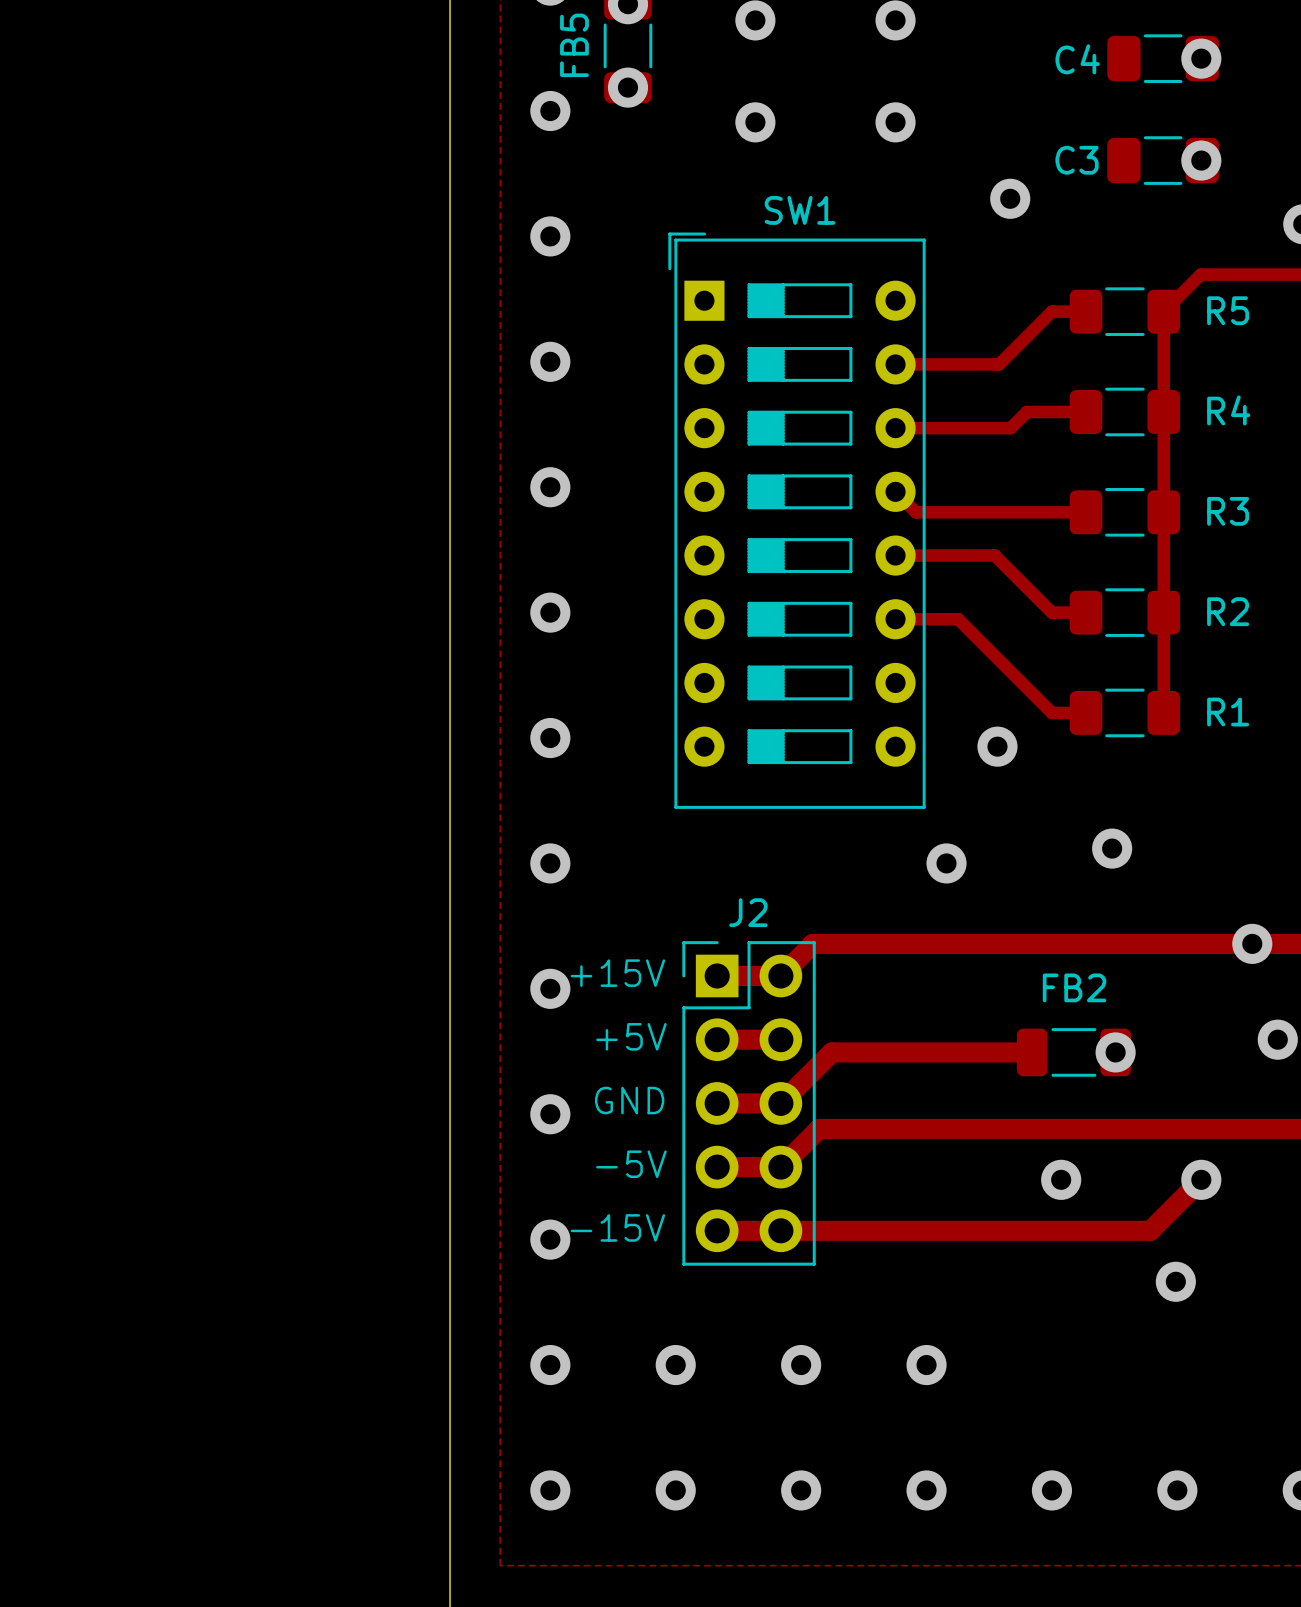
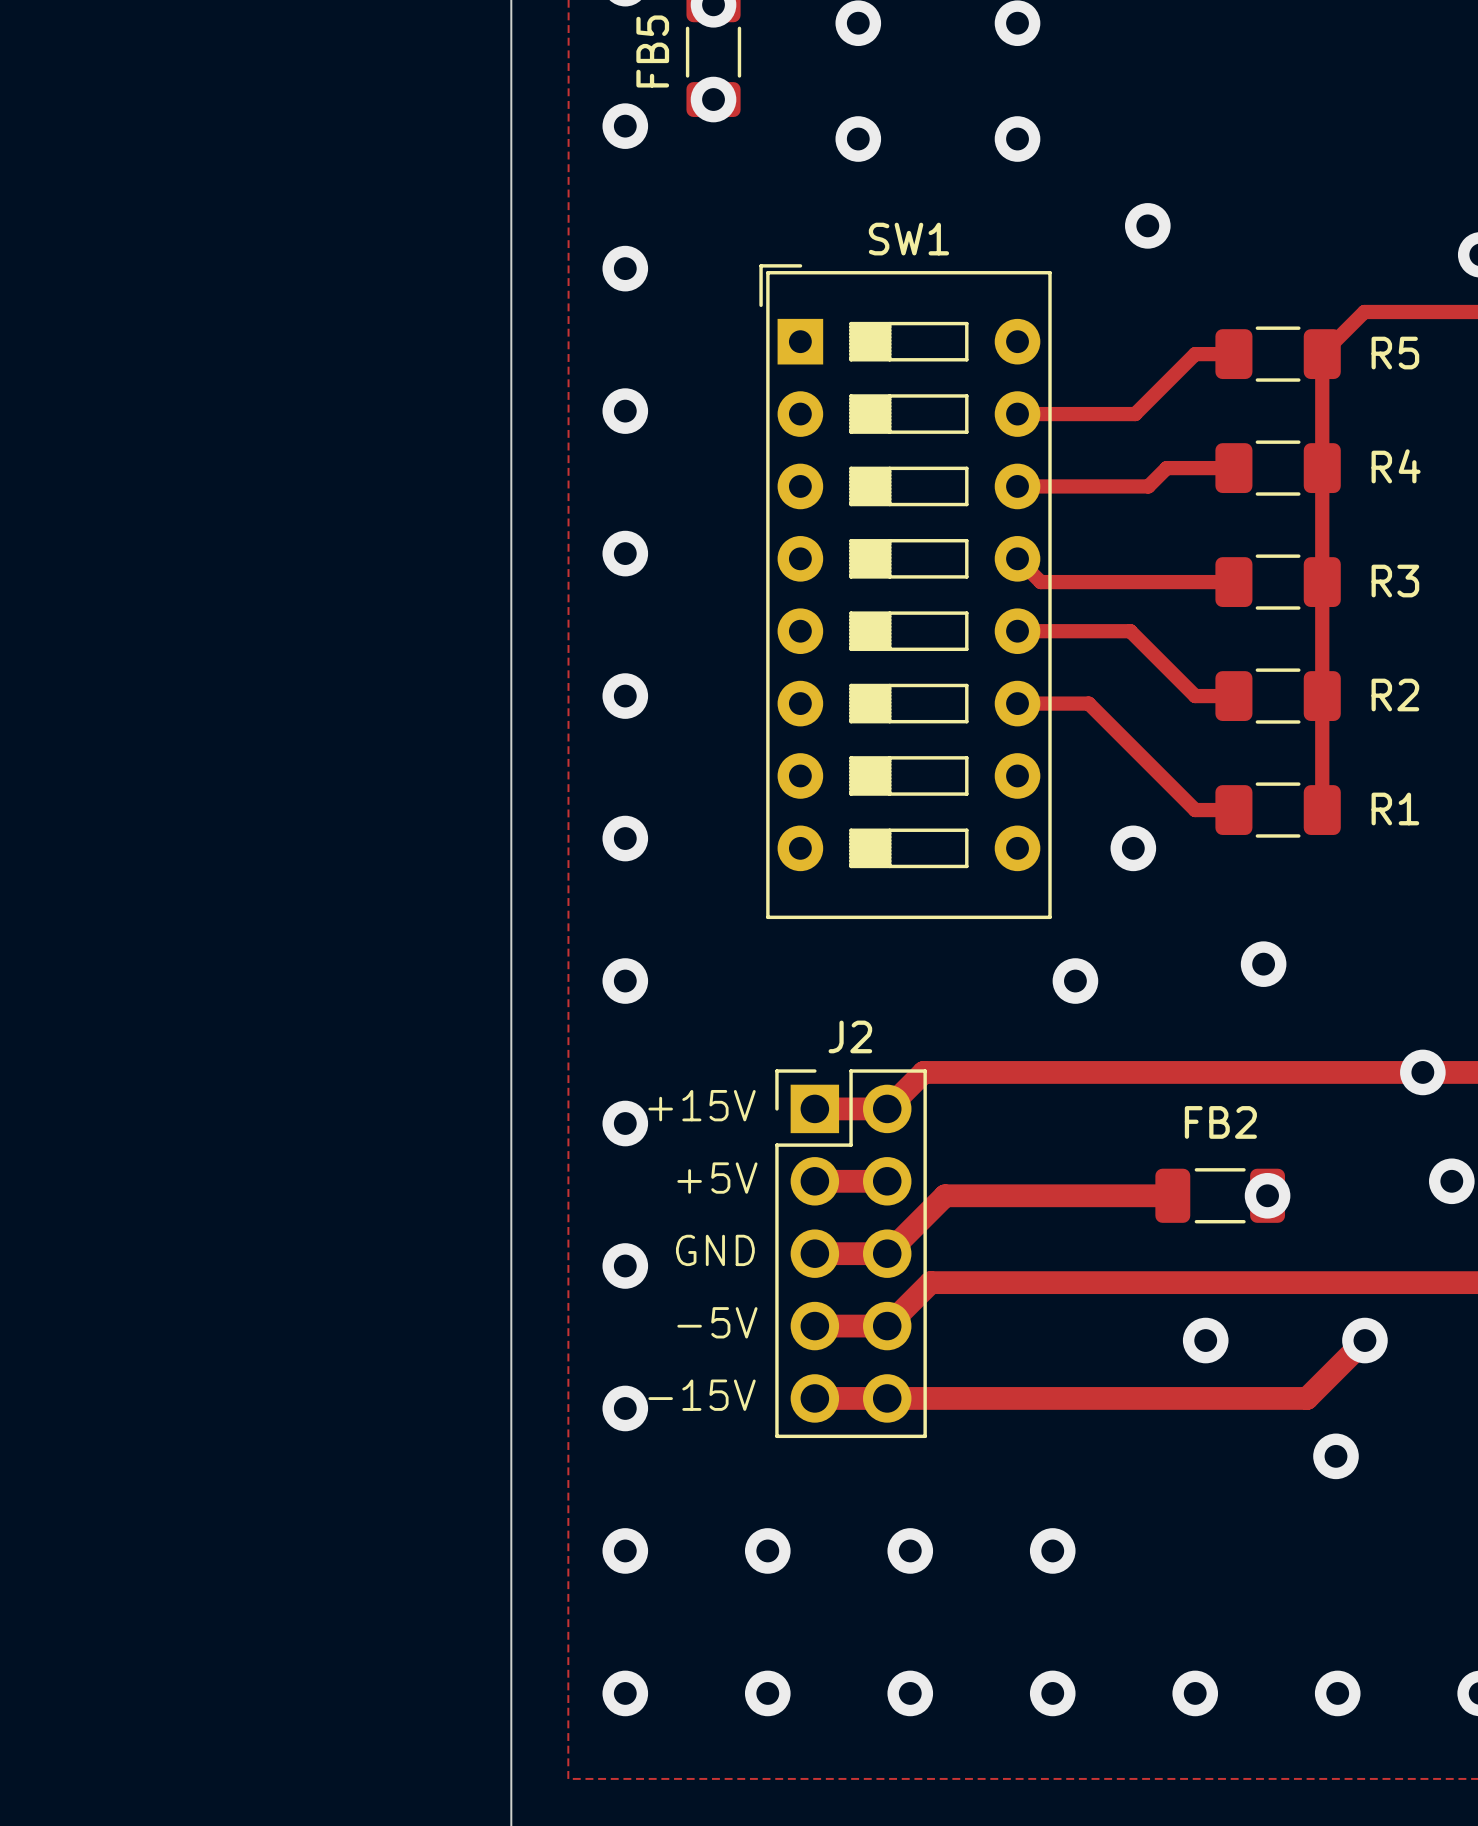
C4: (1163, 58) -> none
via: (1201, 58) -> none
C3: (1163, 160) -> none
via: (1201, 160) -> none

